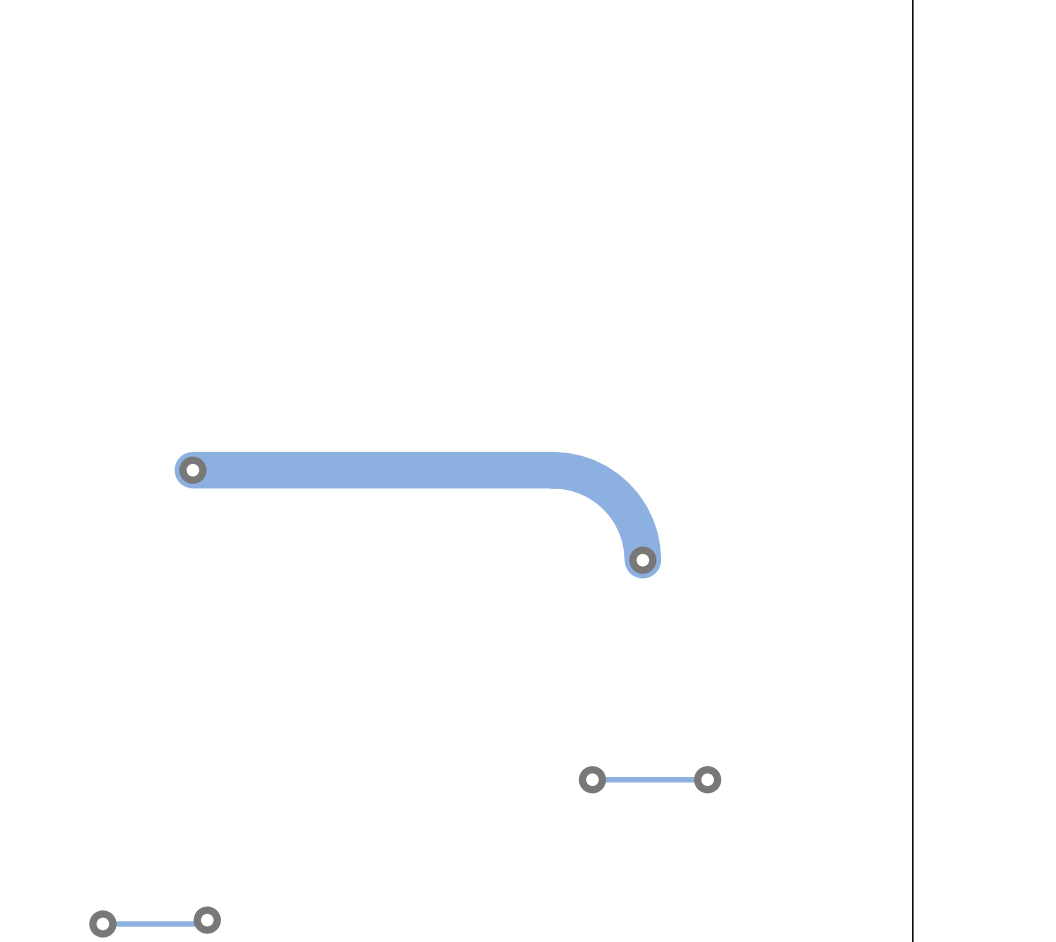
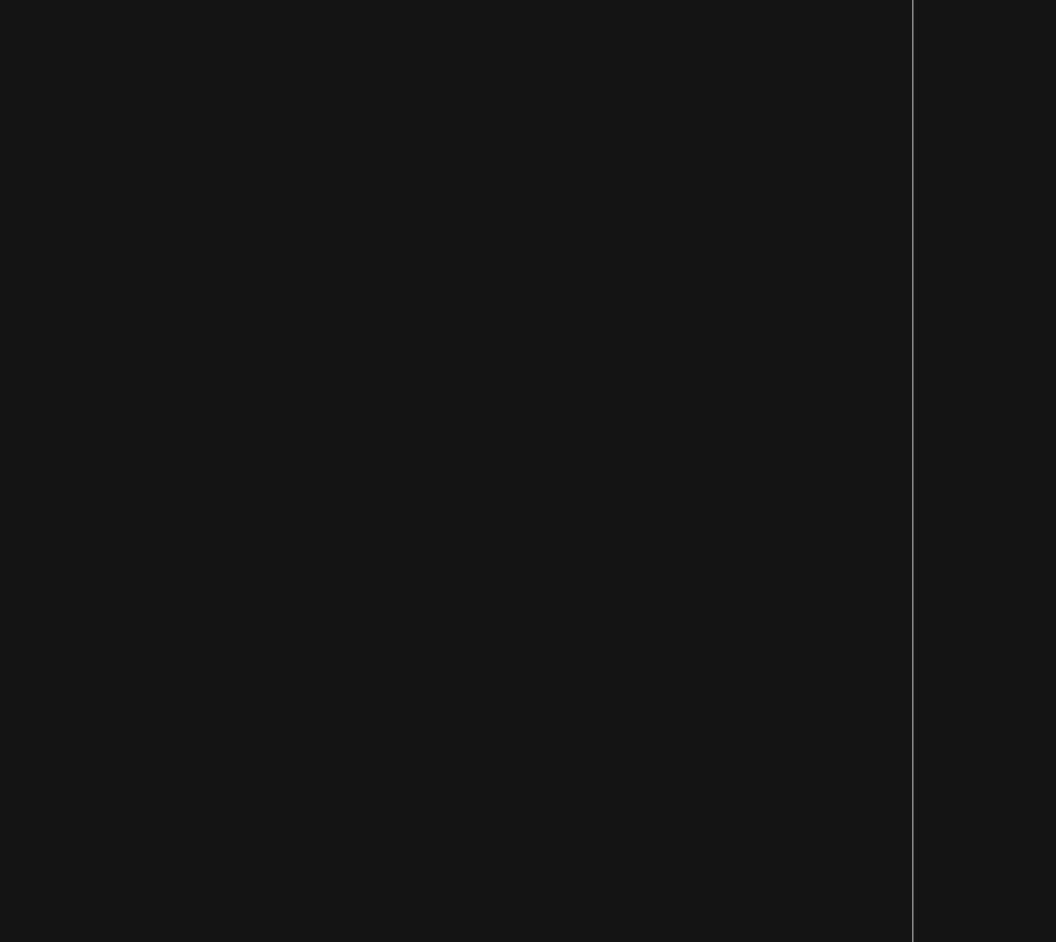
track: (192, 470) (552, 470) (576, 473) (587, 477) (607, 488) (624, 505) (630, 515) (639, 536) (642, 560) -> none
via: (192, 470) -> none
via: (642, 560) -> none
via: (592, 779) -> none
track: (707, 779) (592, 779) -> none
via: (707, 779) -> none
track: (207, 920) (203, 923) (102, 923) -> none
via: (207, 920) -> none
via: (102, 923) -> none

